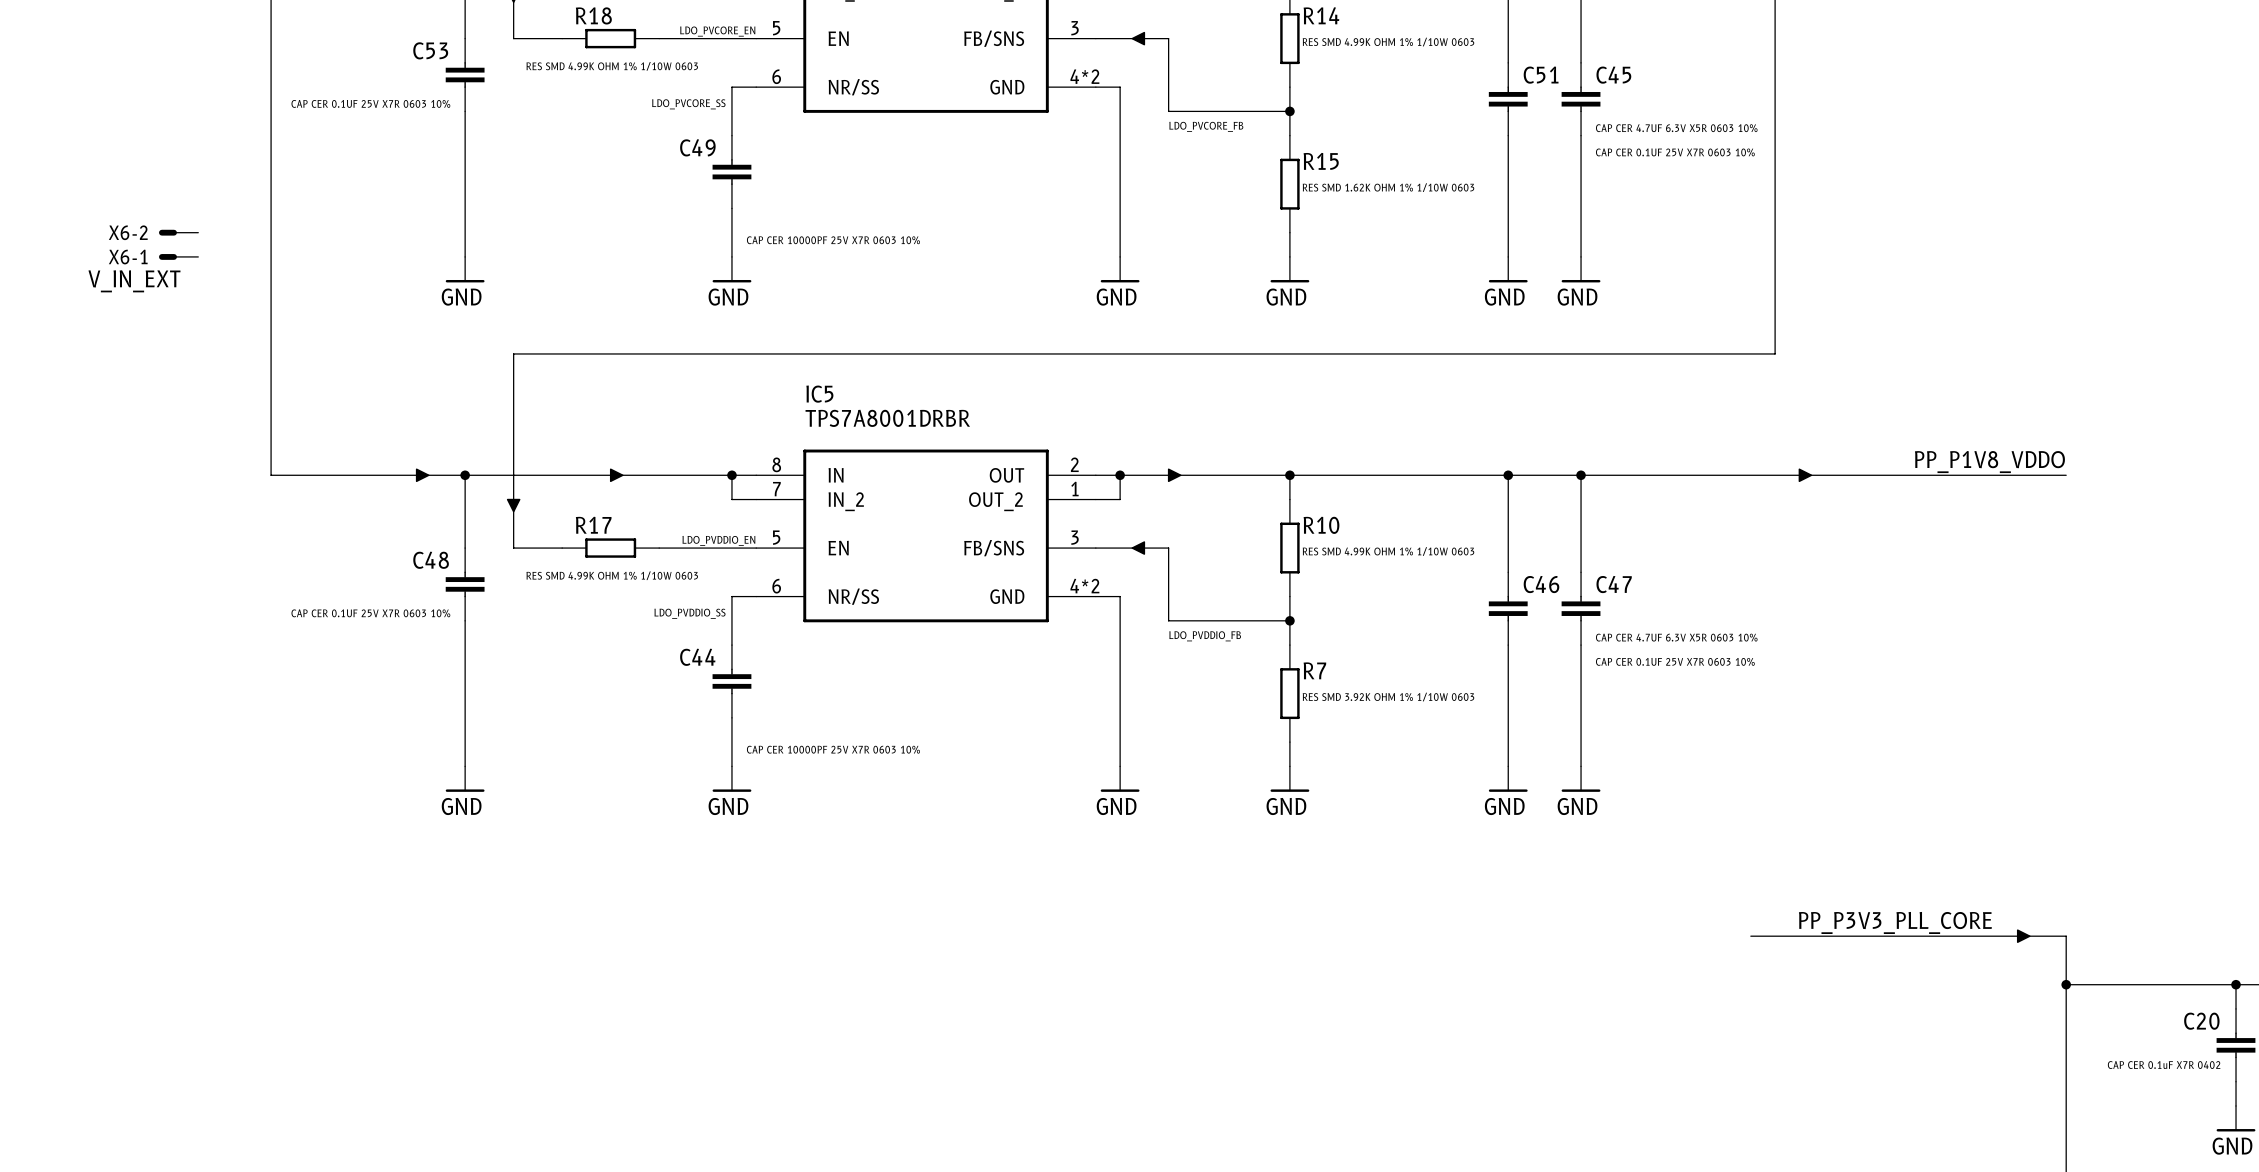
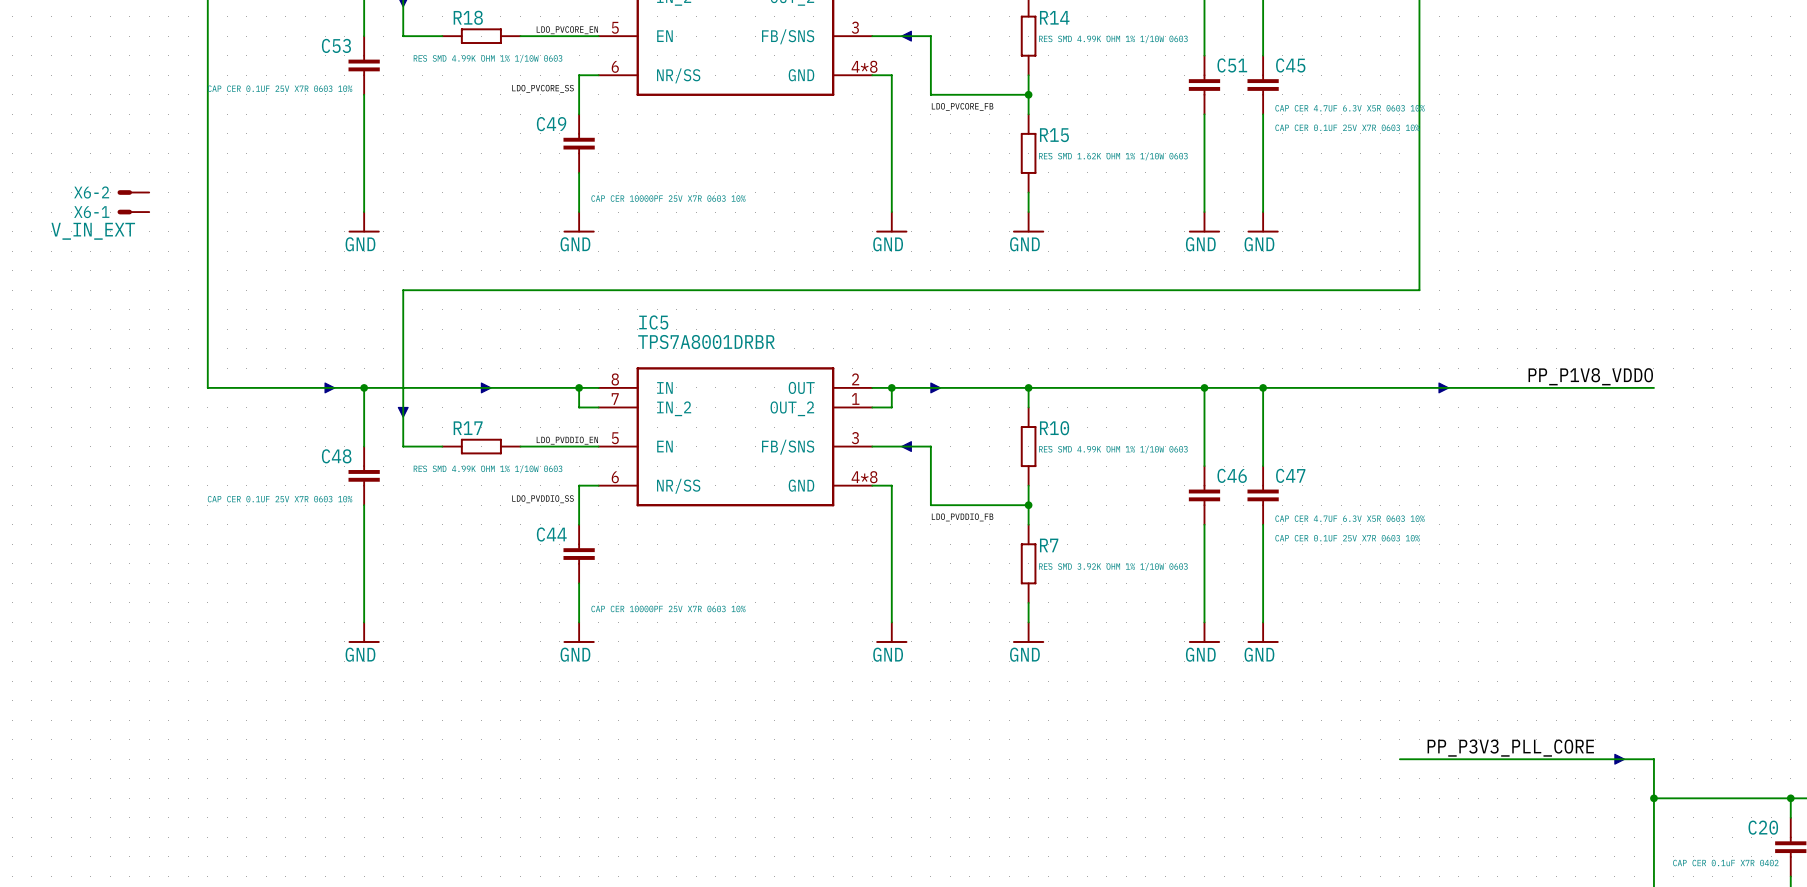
part pin number: 4*2 (1084, 76) -> 4*8 (864, 66)
IC5 pin number: 4*2 (1084, 586) -> 4*8 (864, 477)

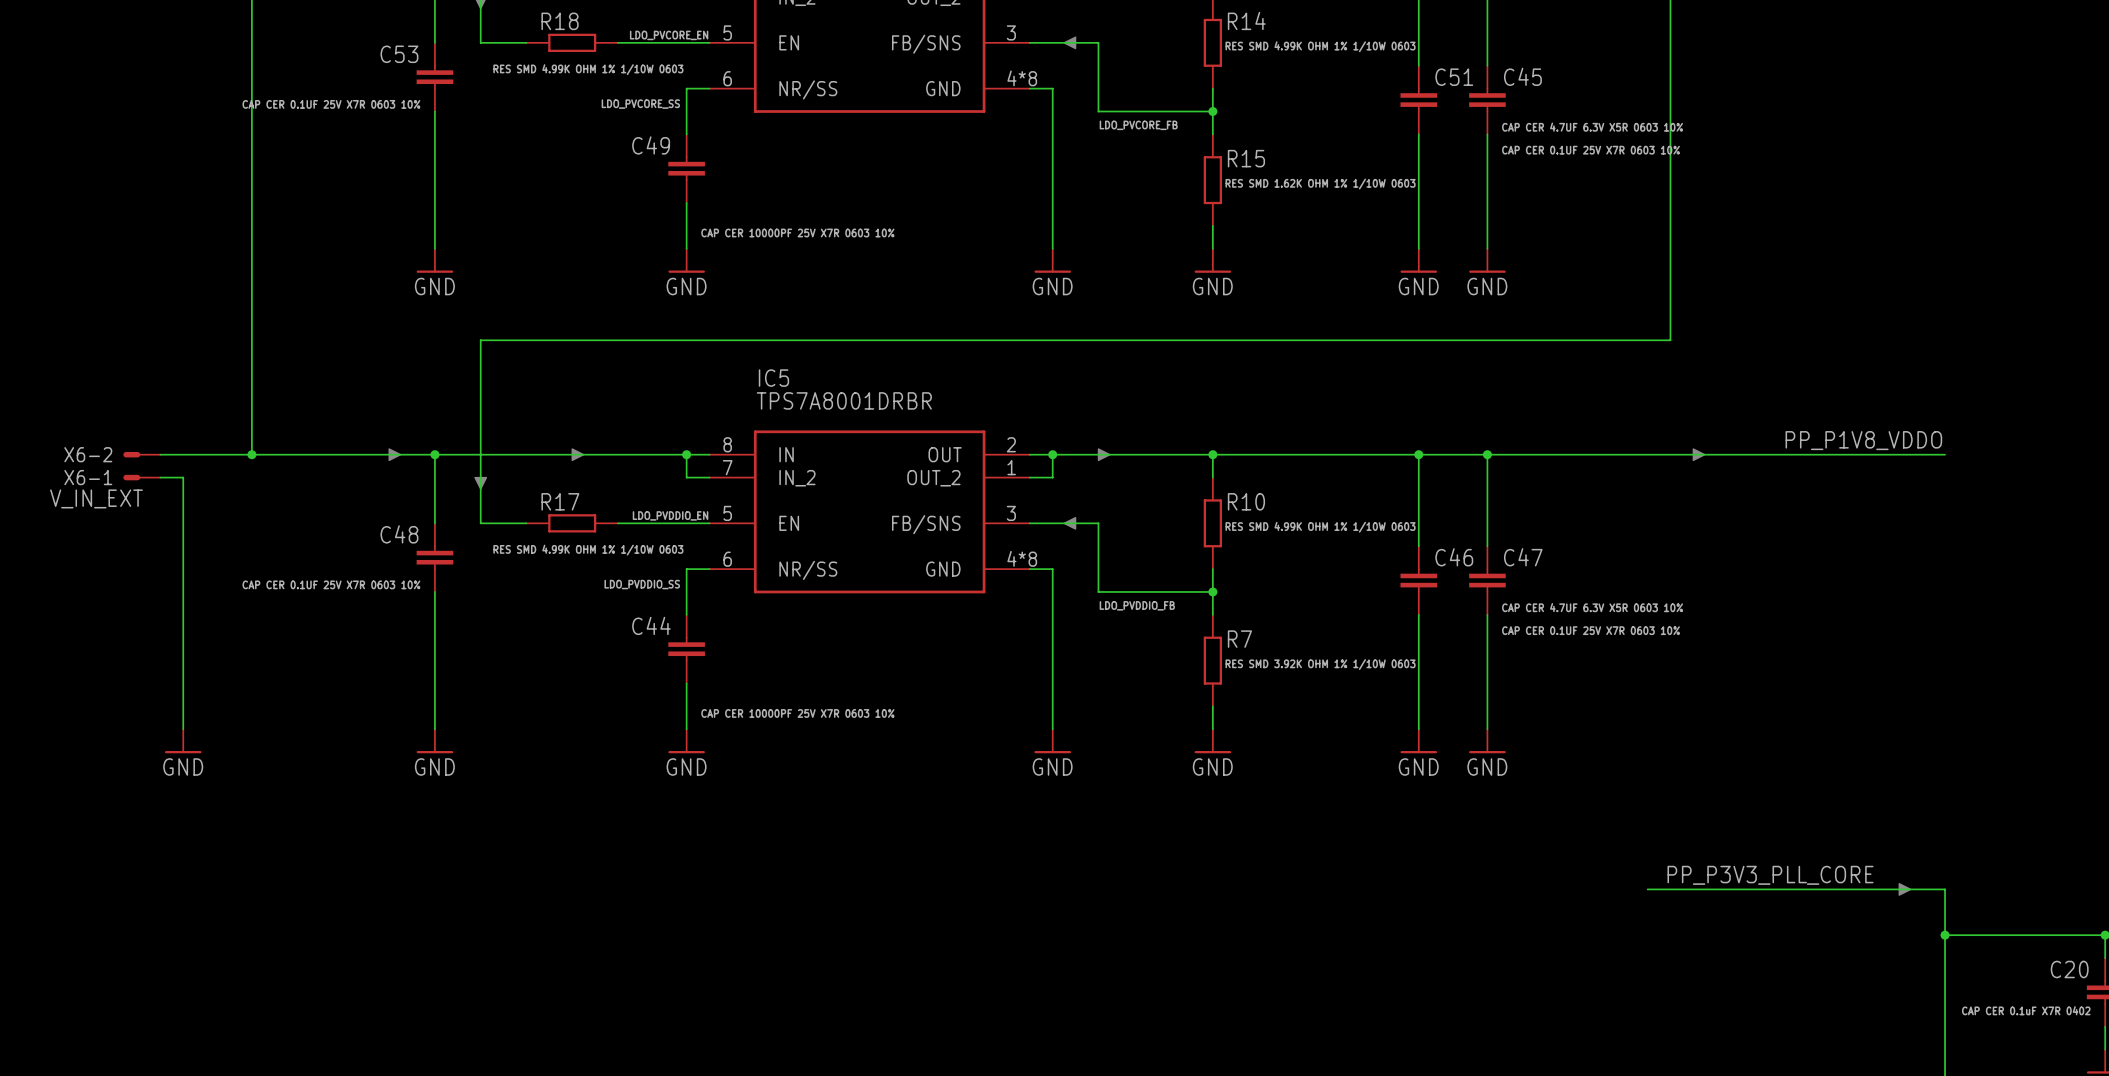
X6-2 position: (133, 192) -> (141, 454)
X6-1 position: (133, 212) -> (141, 477)
wire: none -> (160, 454) (251, 454)
junction: none -> (251, 454)
wire: none -> (160, 477) (183, 477) (183, 729)
power symbol: none -> GND (183, 741)

